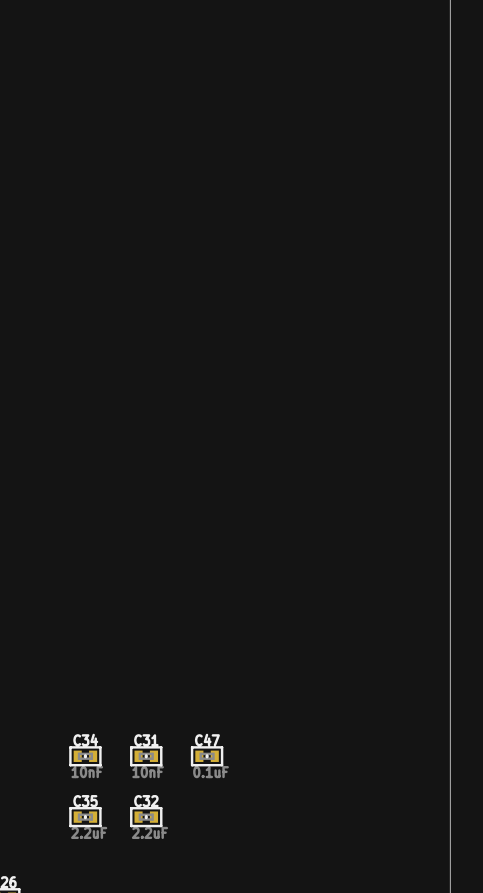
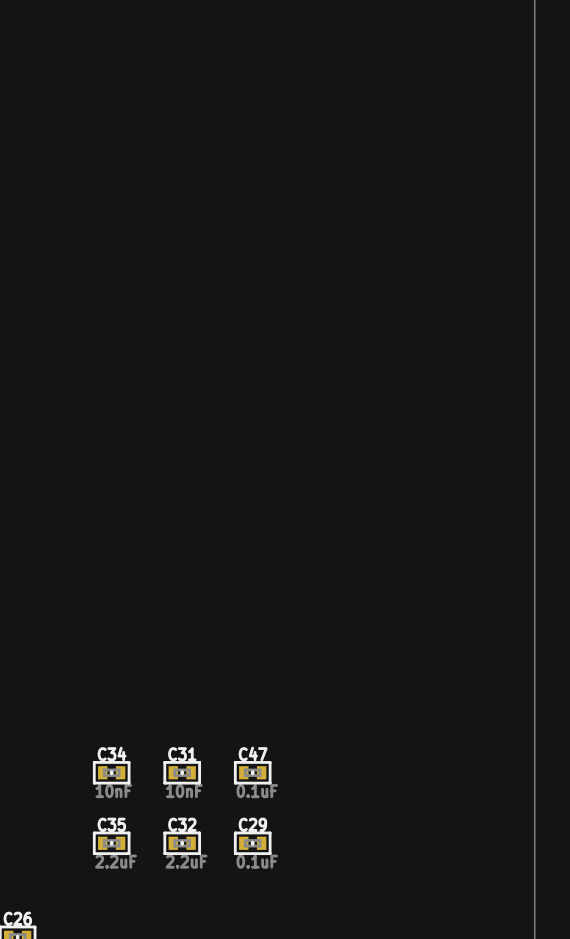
C29: none -> 0.1uF (252, 843)

